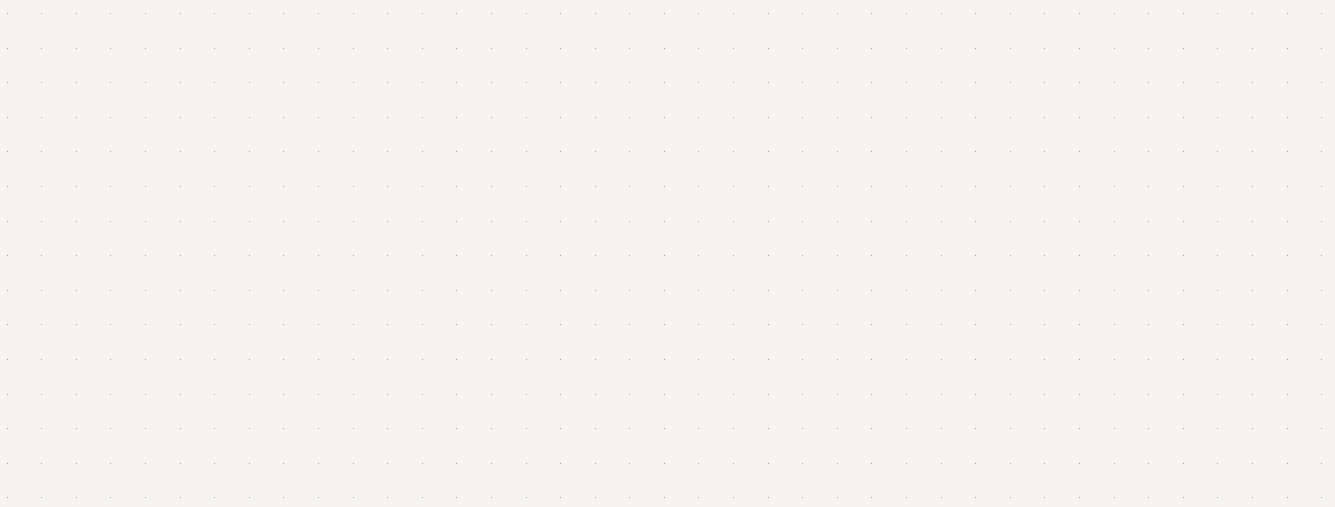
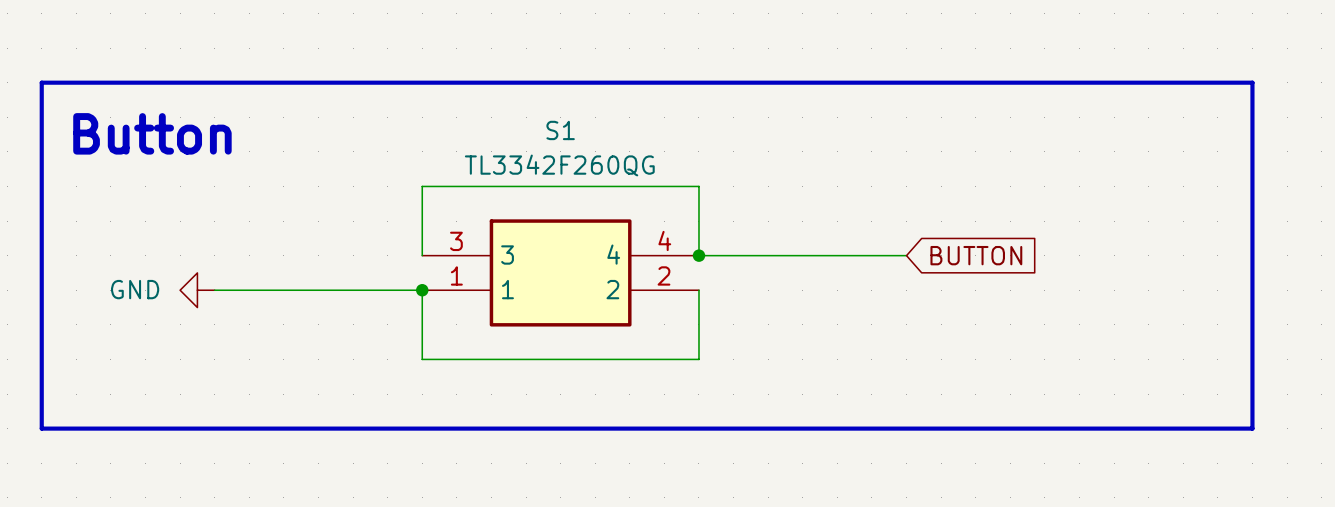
line: none -> (41, 82) (1252, 82) (1252, 428) (41, 428) (41, 82)
text: none -> Button (152, 133)
wire: none -> (422, 255) (422, 186) (698, 186) (698, 255) (906, 255)
junction: none -> (698, 255)
global label: none -> BUTTON (976, 255)
S1: none -> TL3342F260QG (560, 272)
power symbol: none -> GND (197, 290)
wire: none -> (214, 290) (422, 290) (422, 359) (698, 359) (698, 290)
junction: none -> (422, 290)

